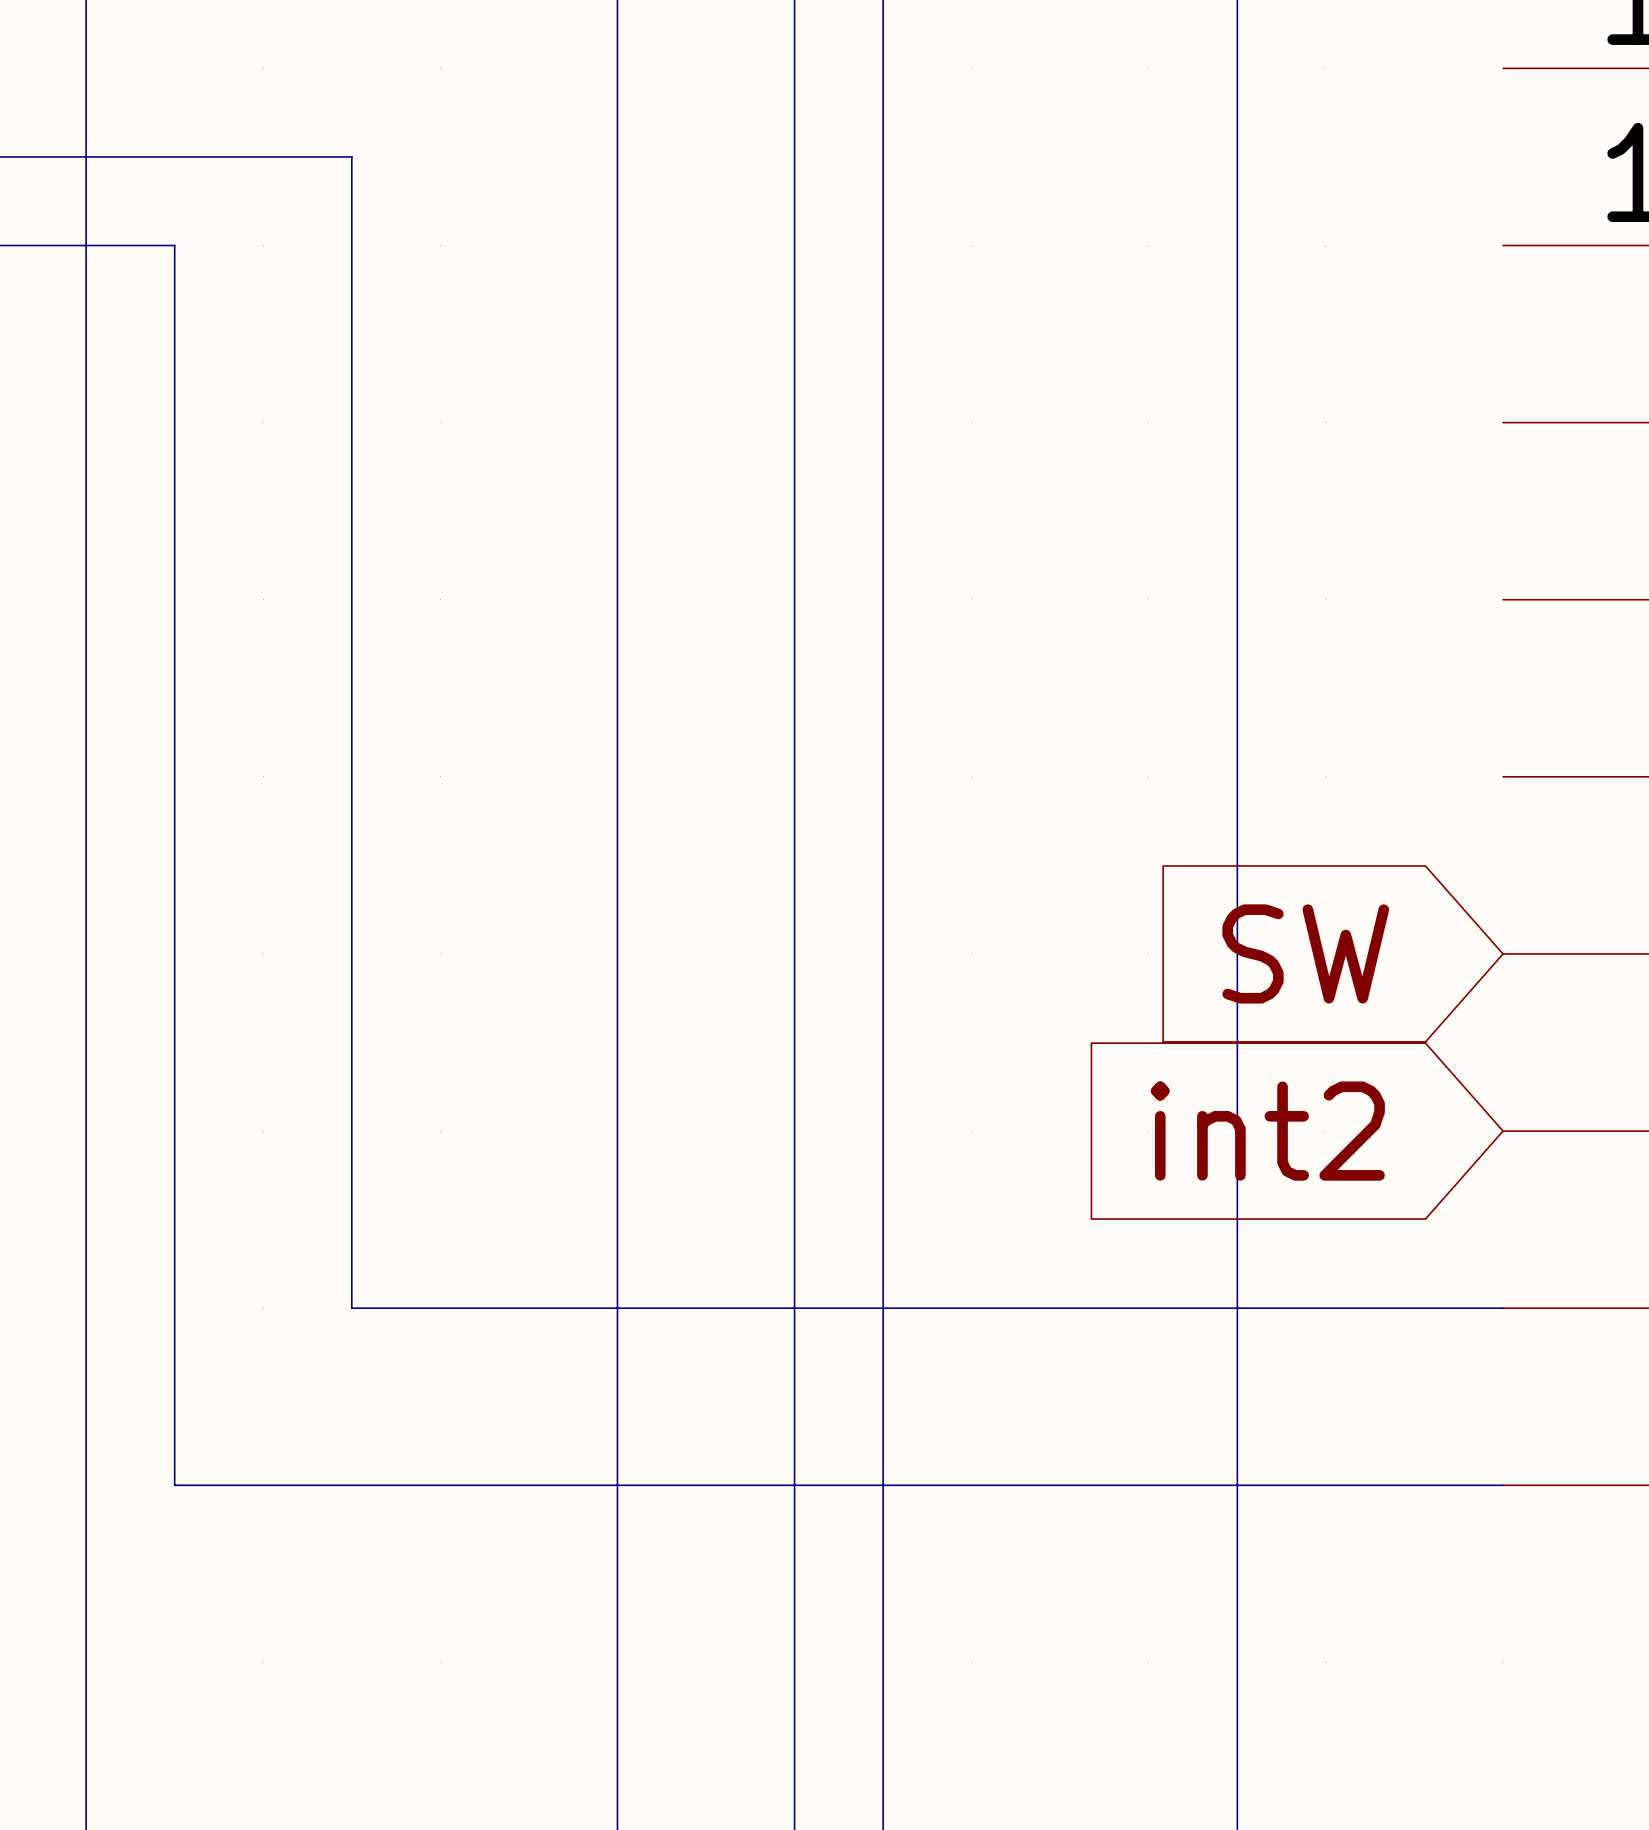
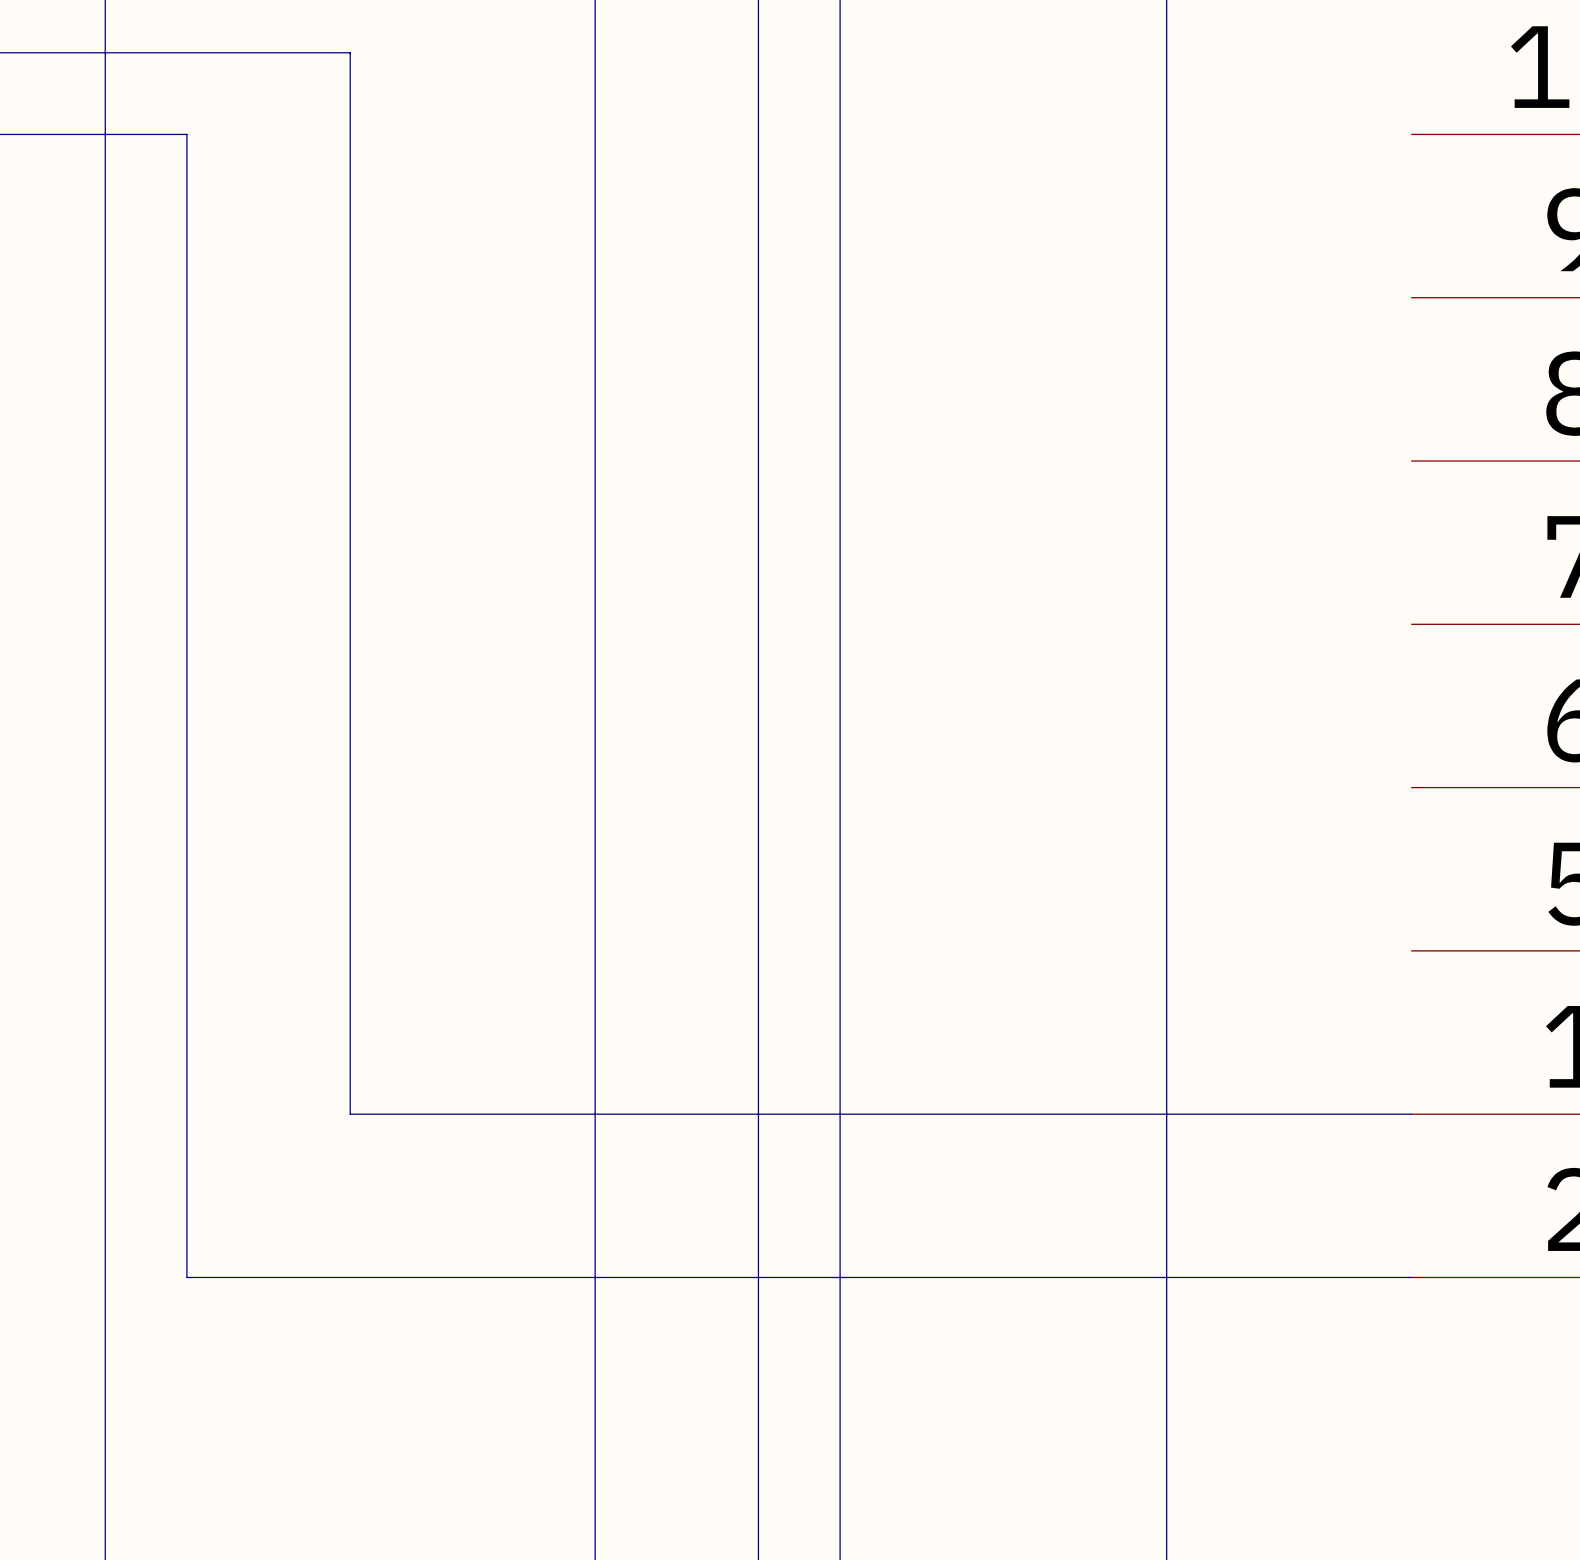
global label: SW (1305, 953) -> none
global label: int2 (1267, 1131) -> none

